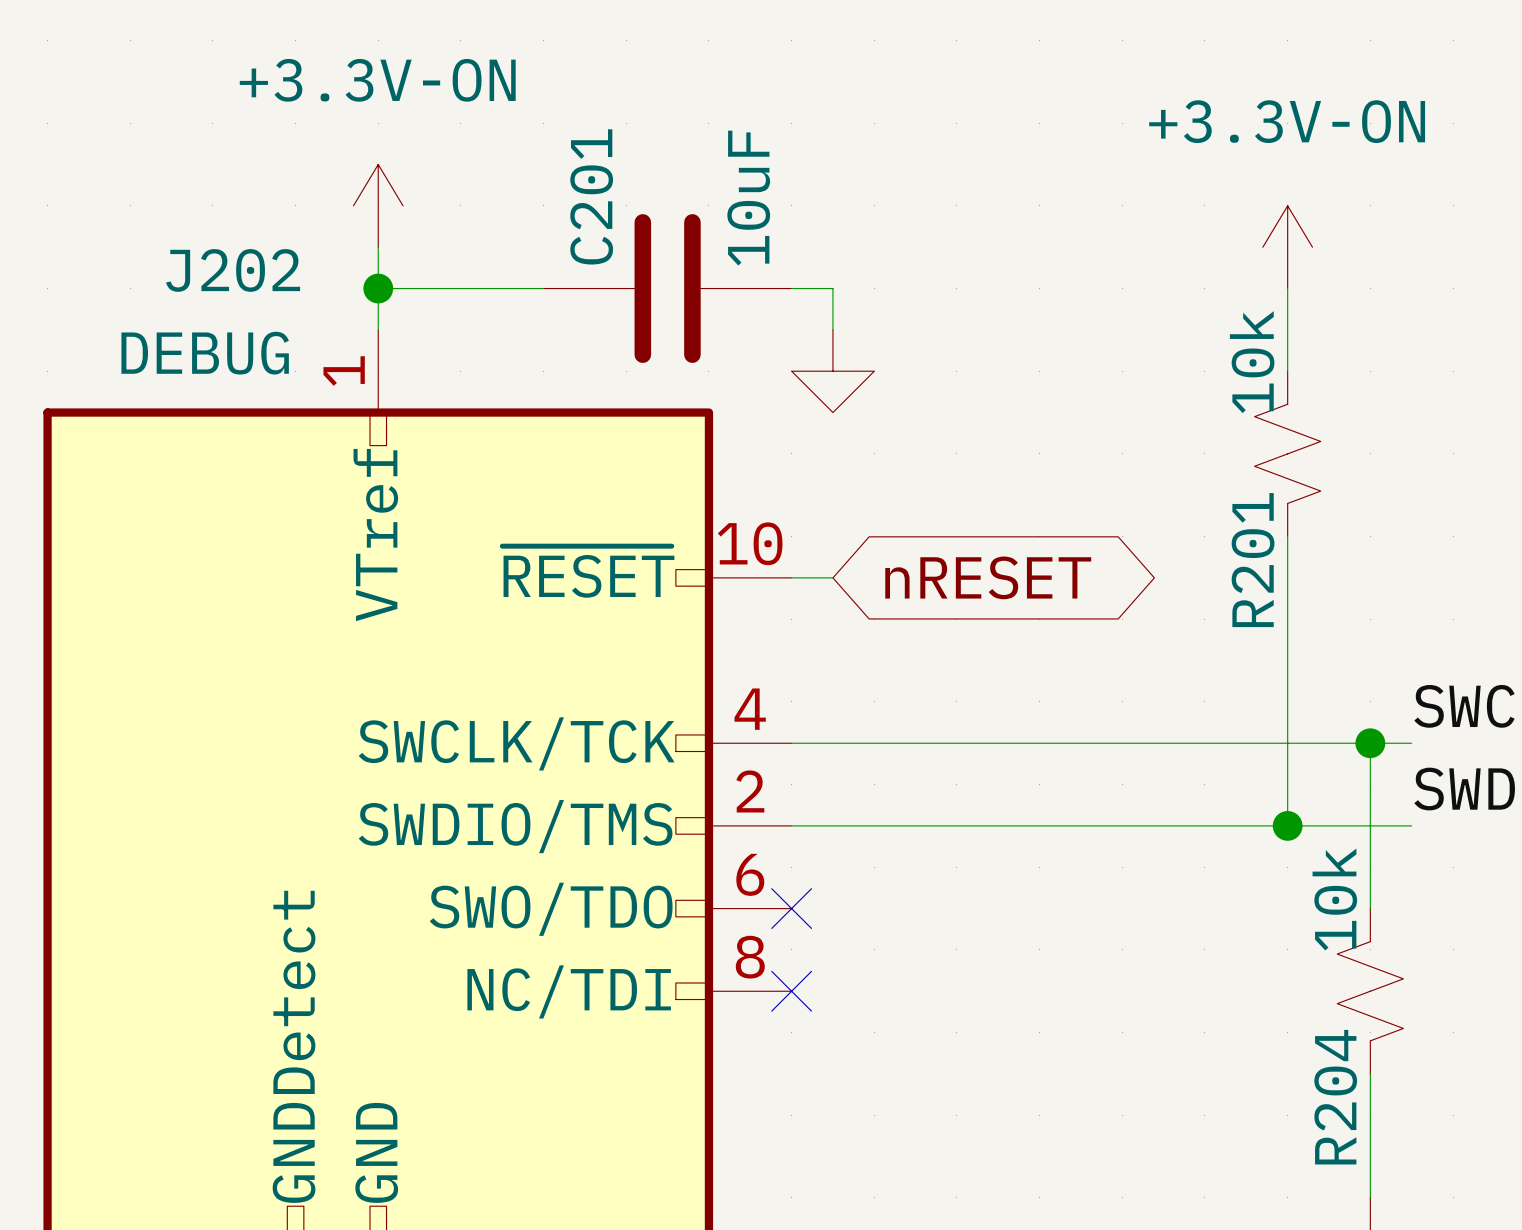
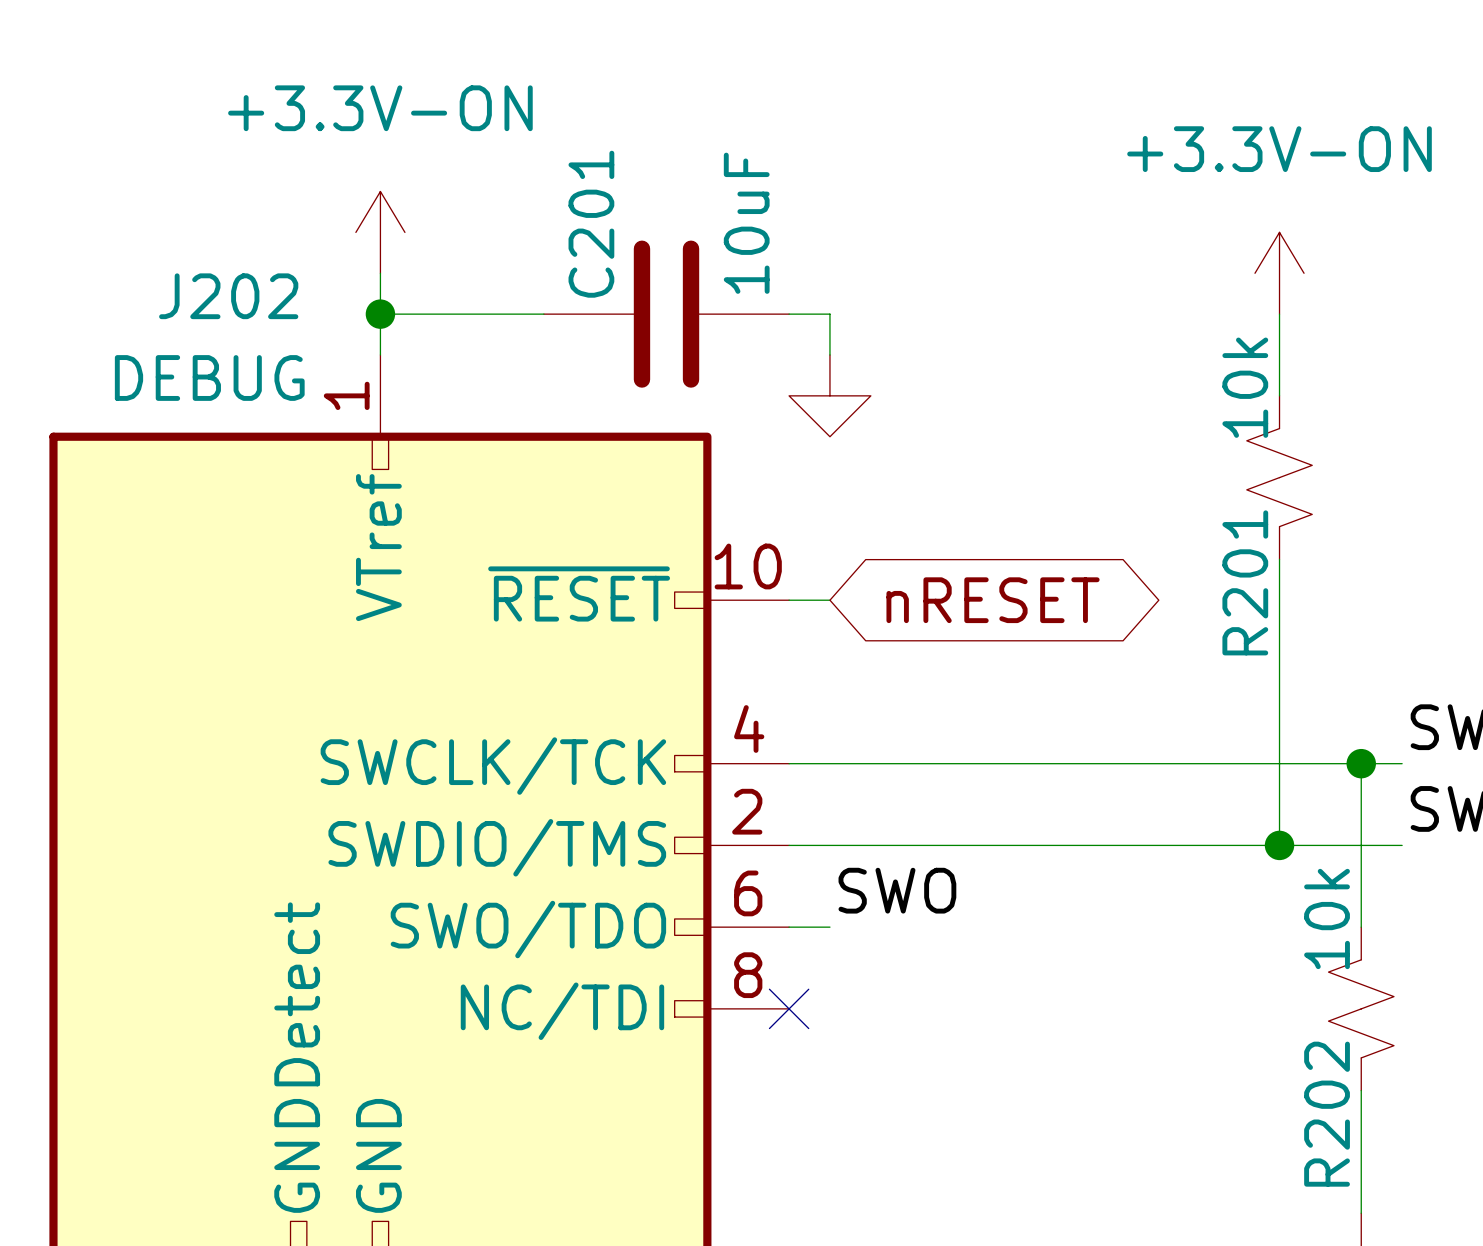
label: none -> SWO (897, 890)
wire: none -> (789, 927) (829, 927)
no-connect mark: (791, 908) -> none
R204 name: R204 (1335, 1097) -> R202 (1327, 1114)

